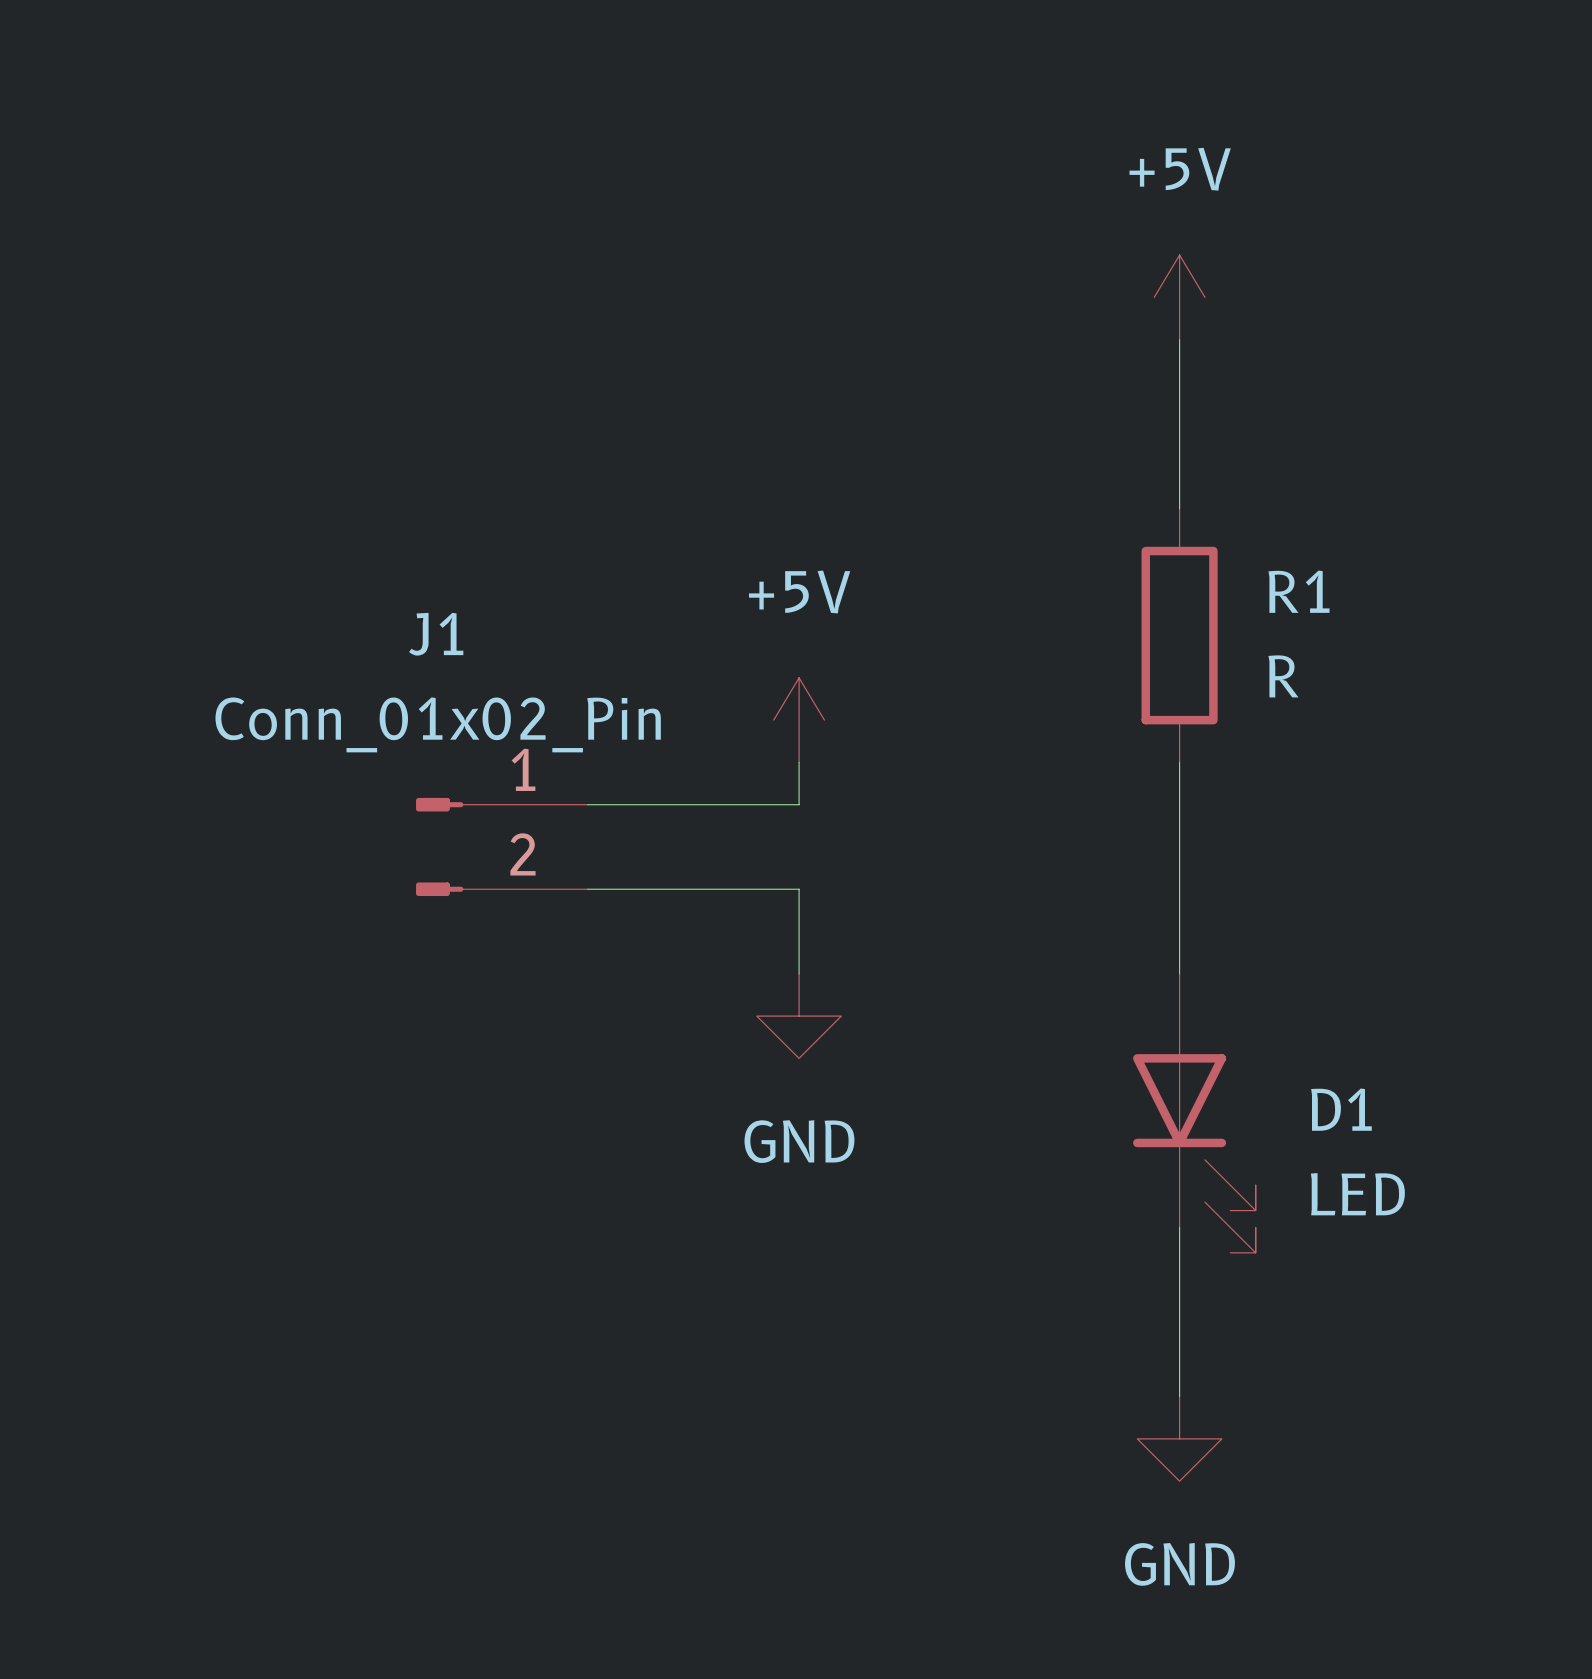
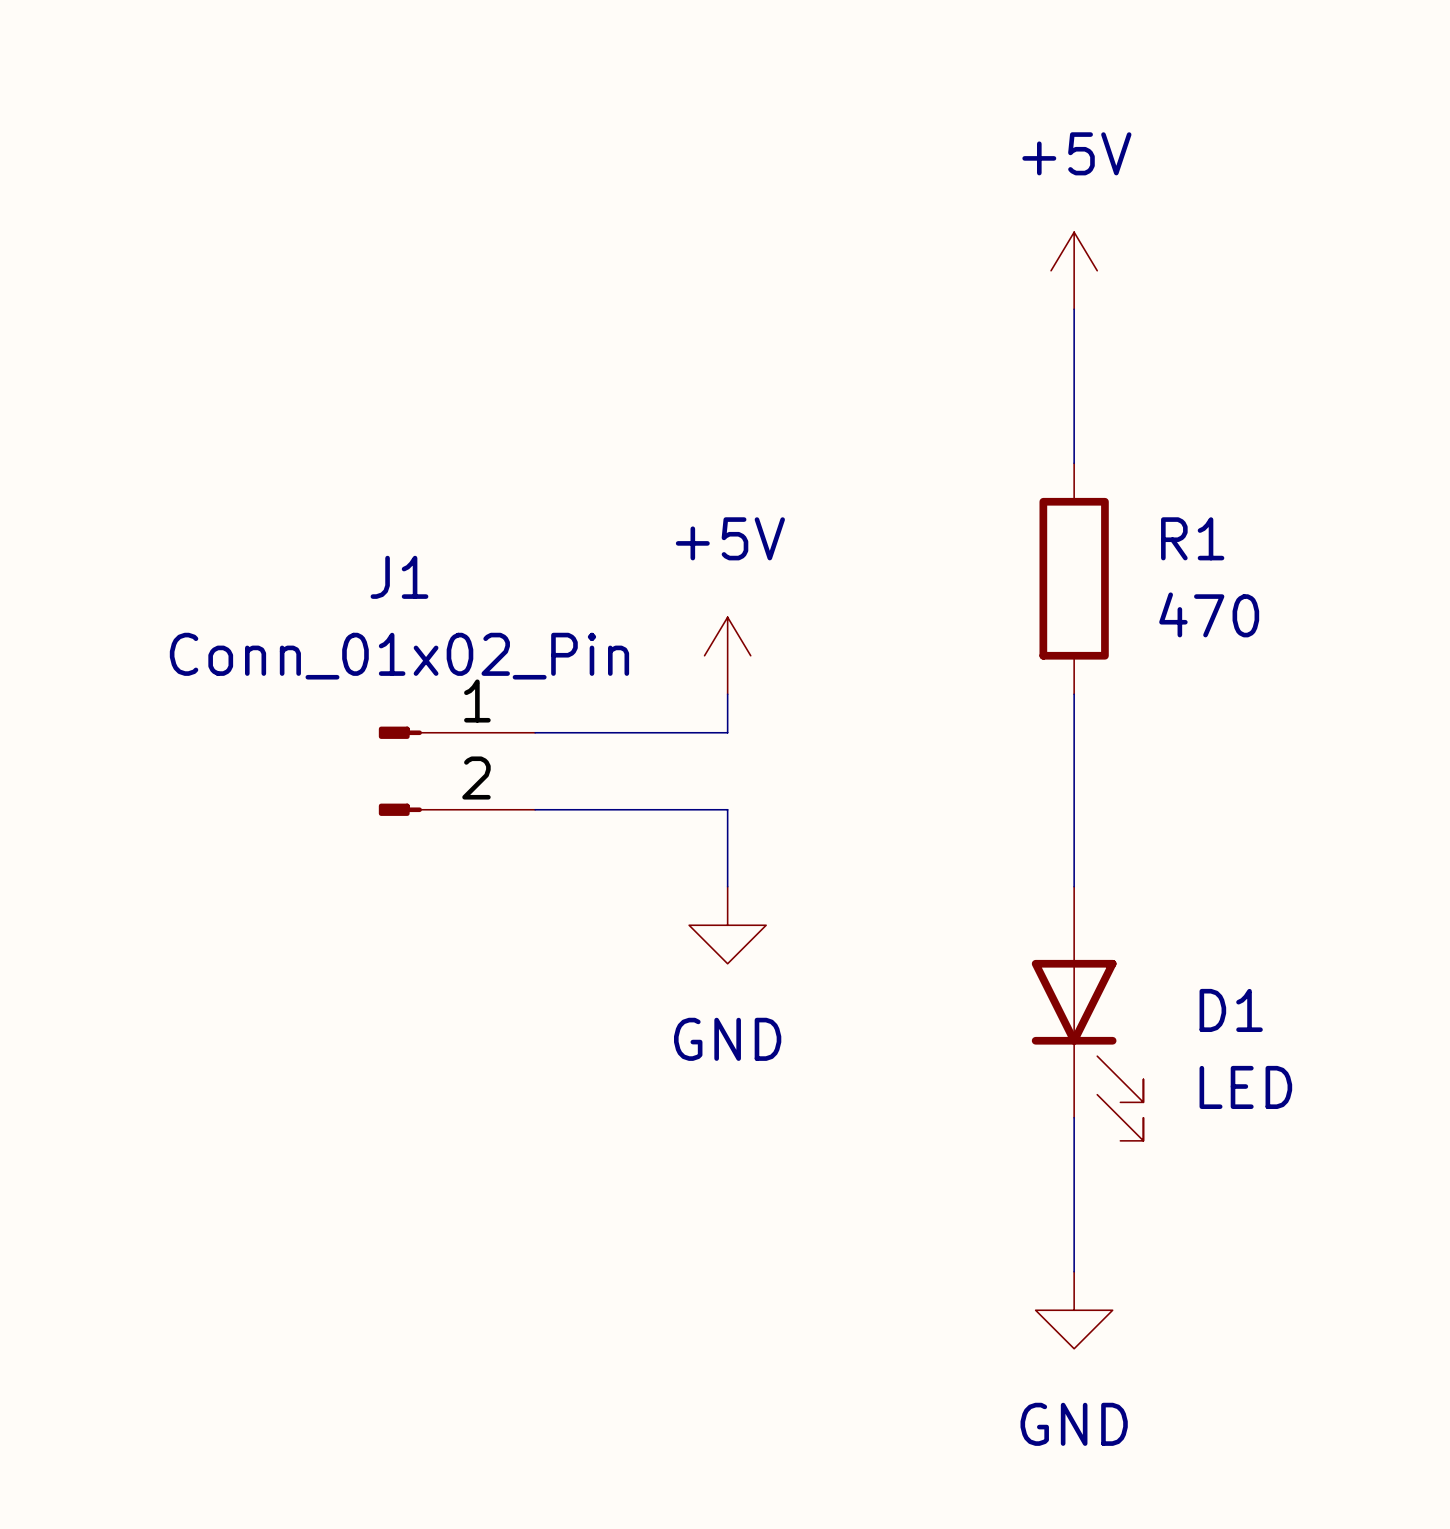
R1 value: R (1283, 676) -> 470 (1209, 614)

